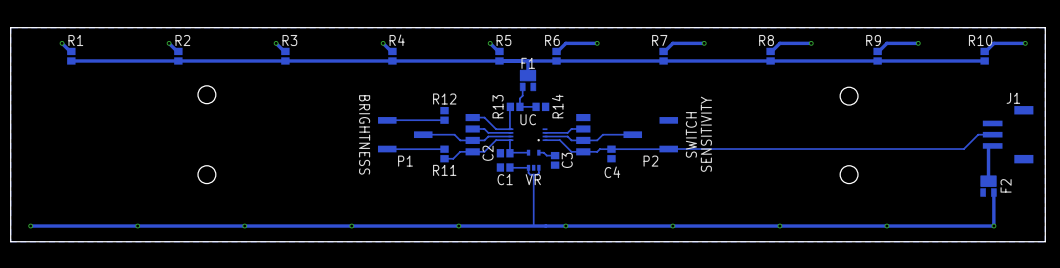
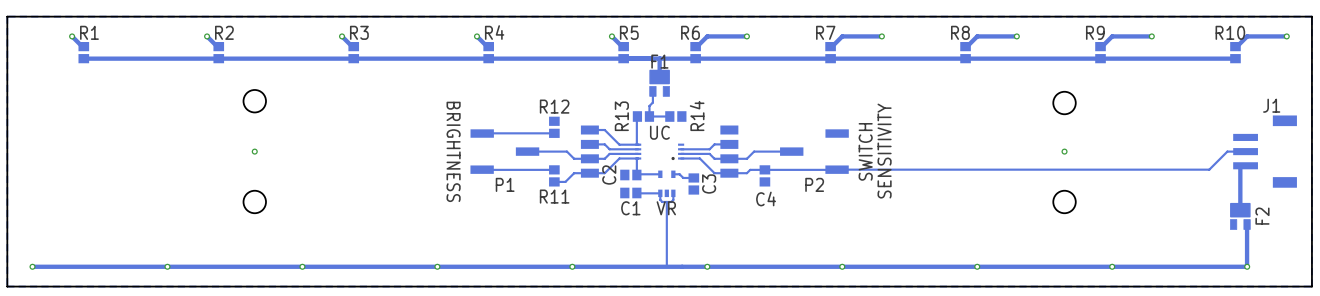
via: none -> (254, 151)
via: none -> (1064, 151)

